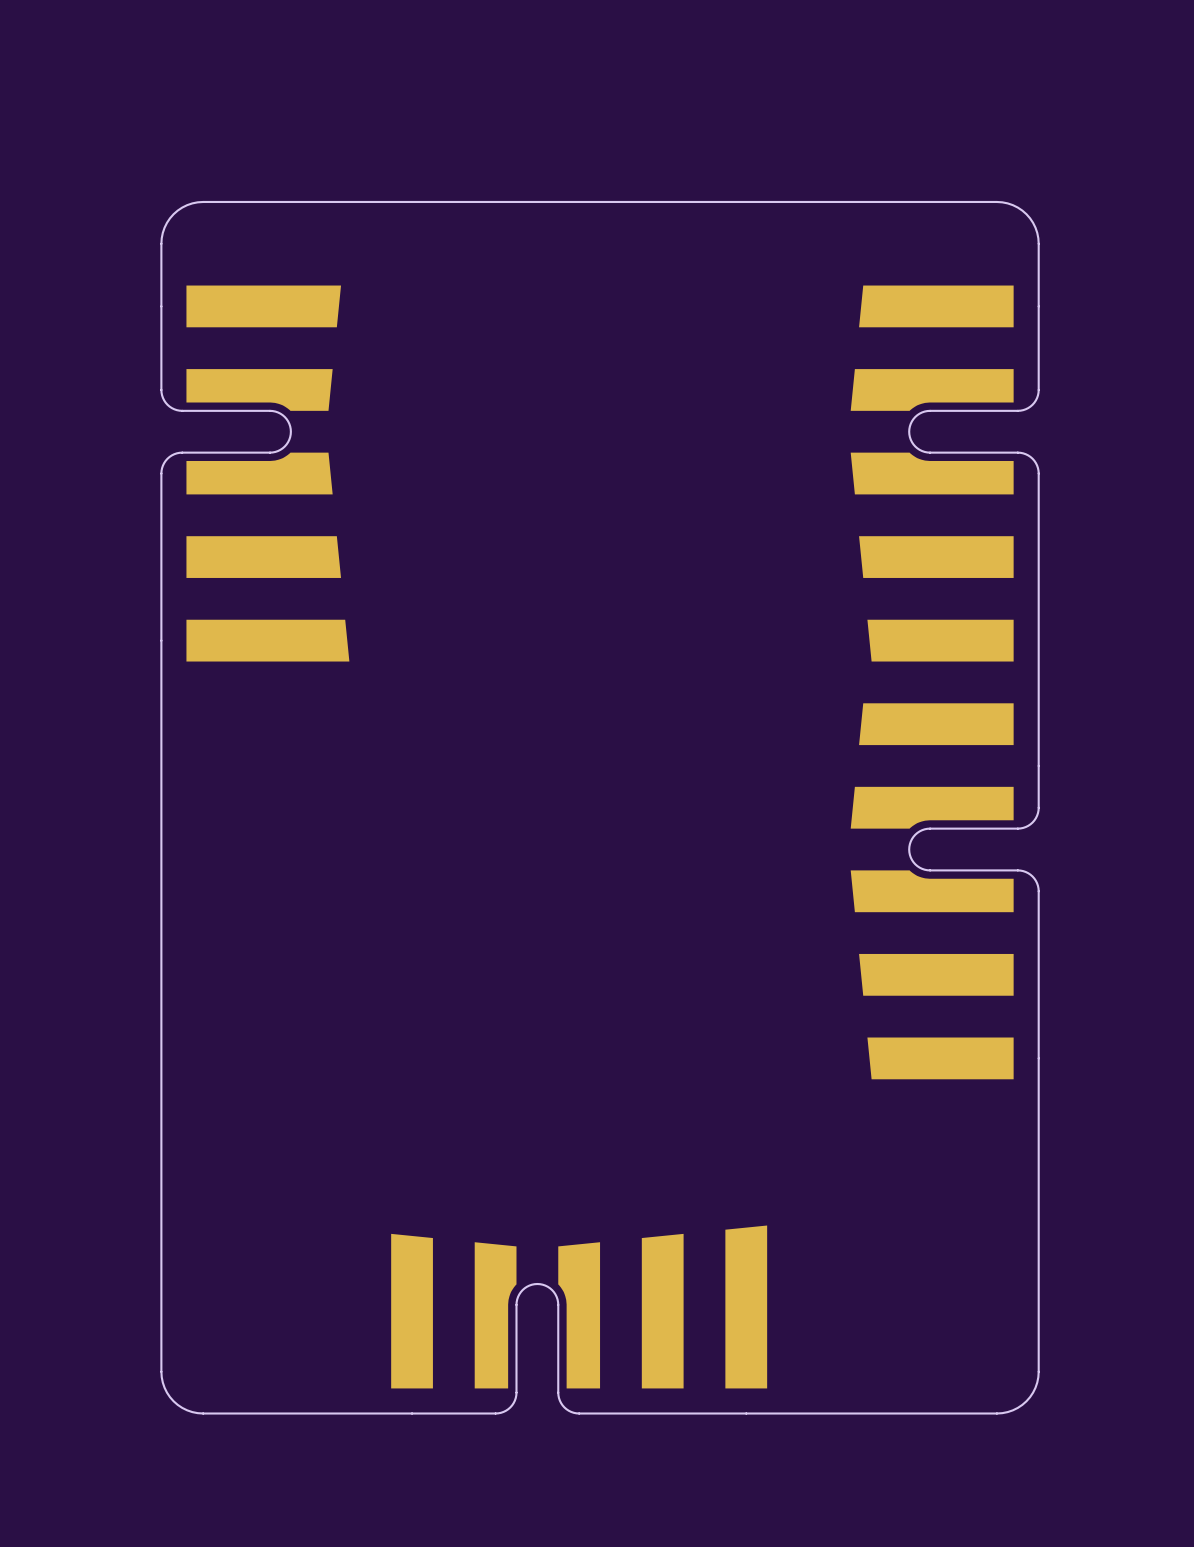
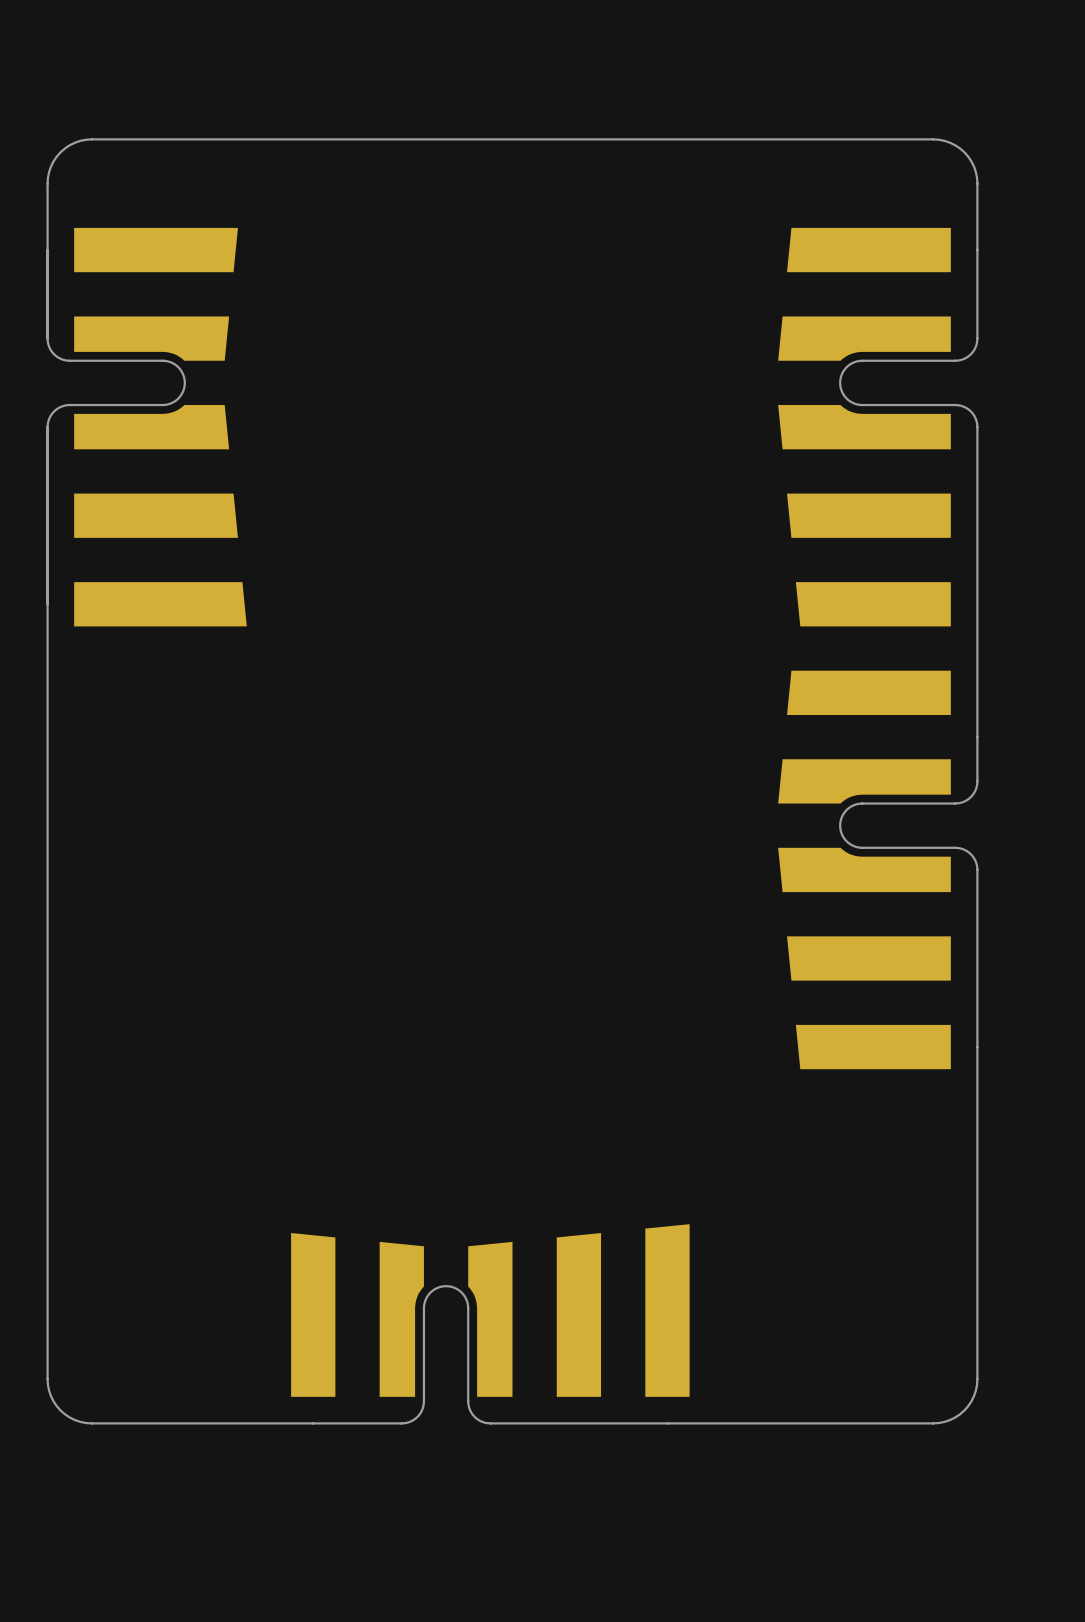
board edge: none -> (47, 250) (47, 338)
board edge: none -> (47, 427) (47, 604)

